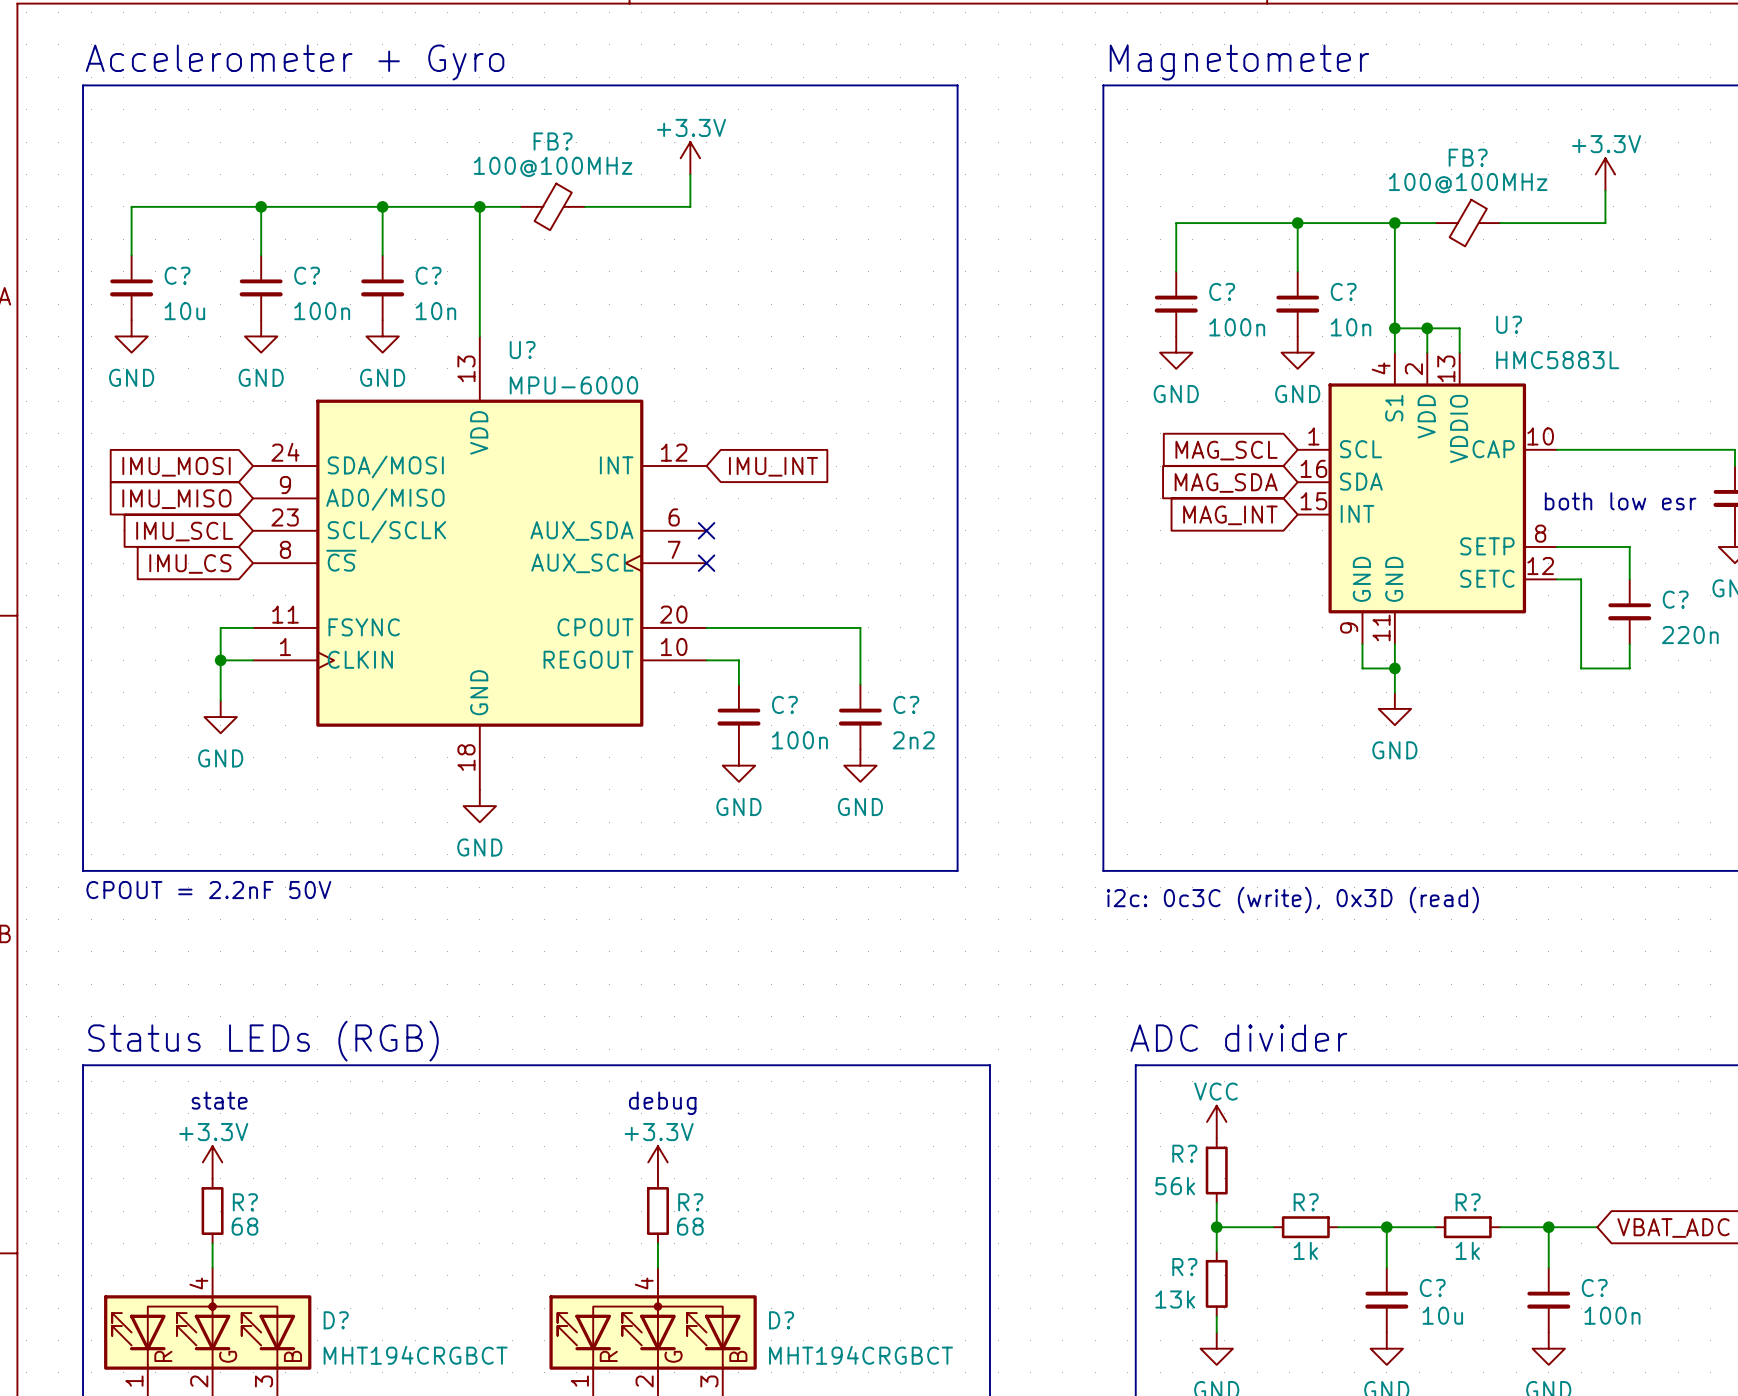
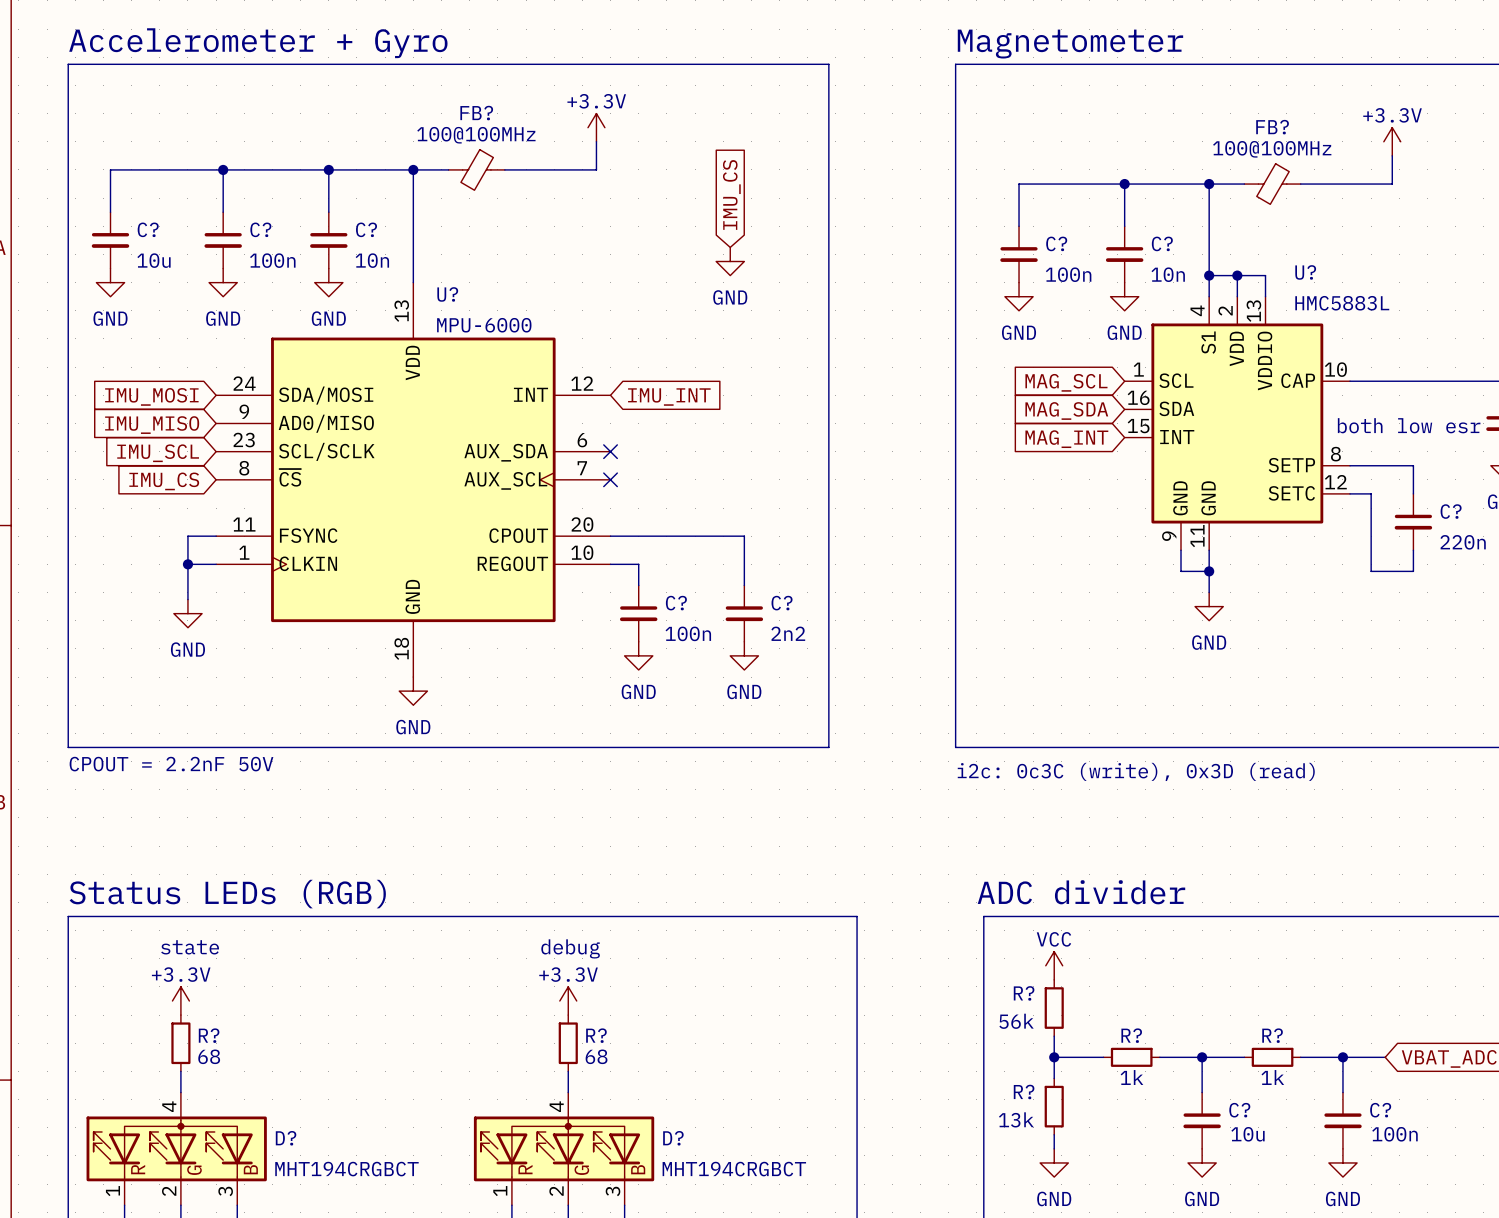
global label: none -> IMU_CS (731, 194)
power symbol: none -> GND (730, 261)

